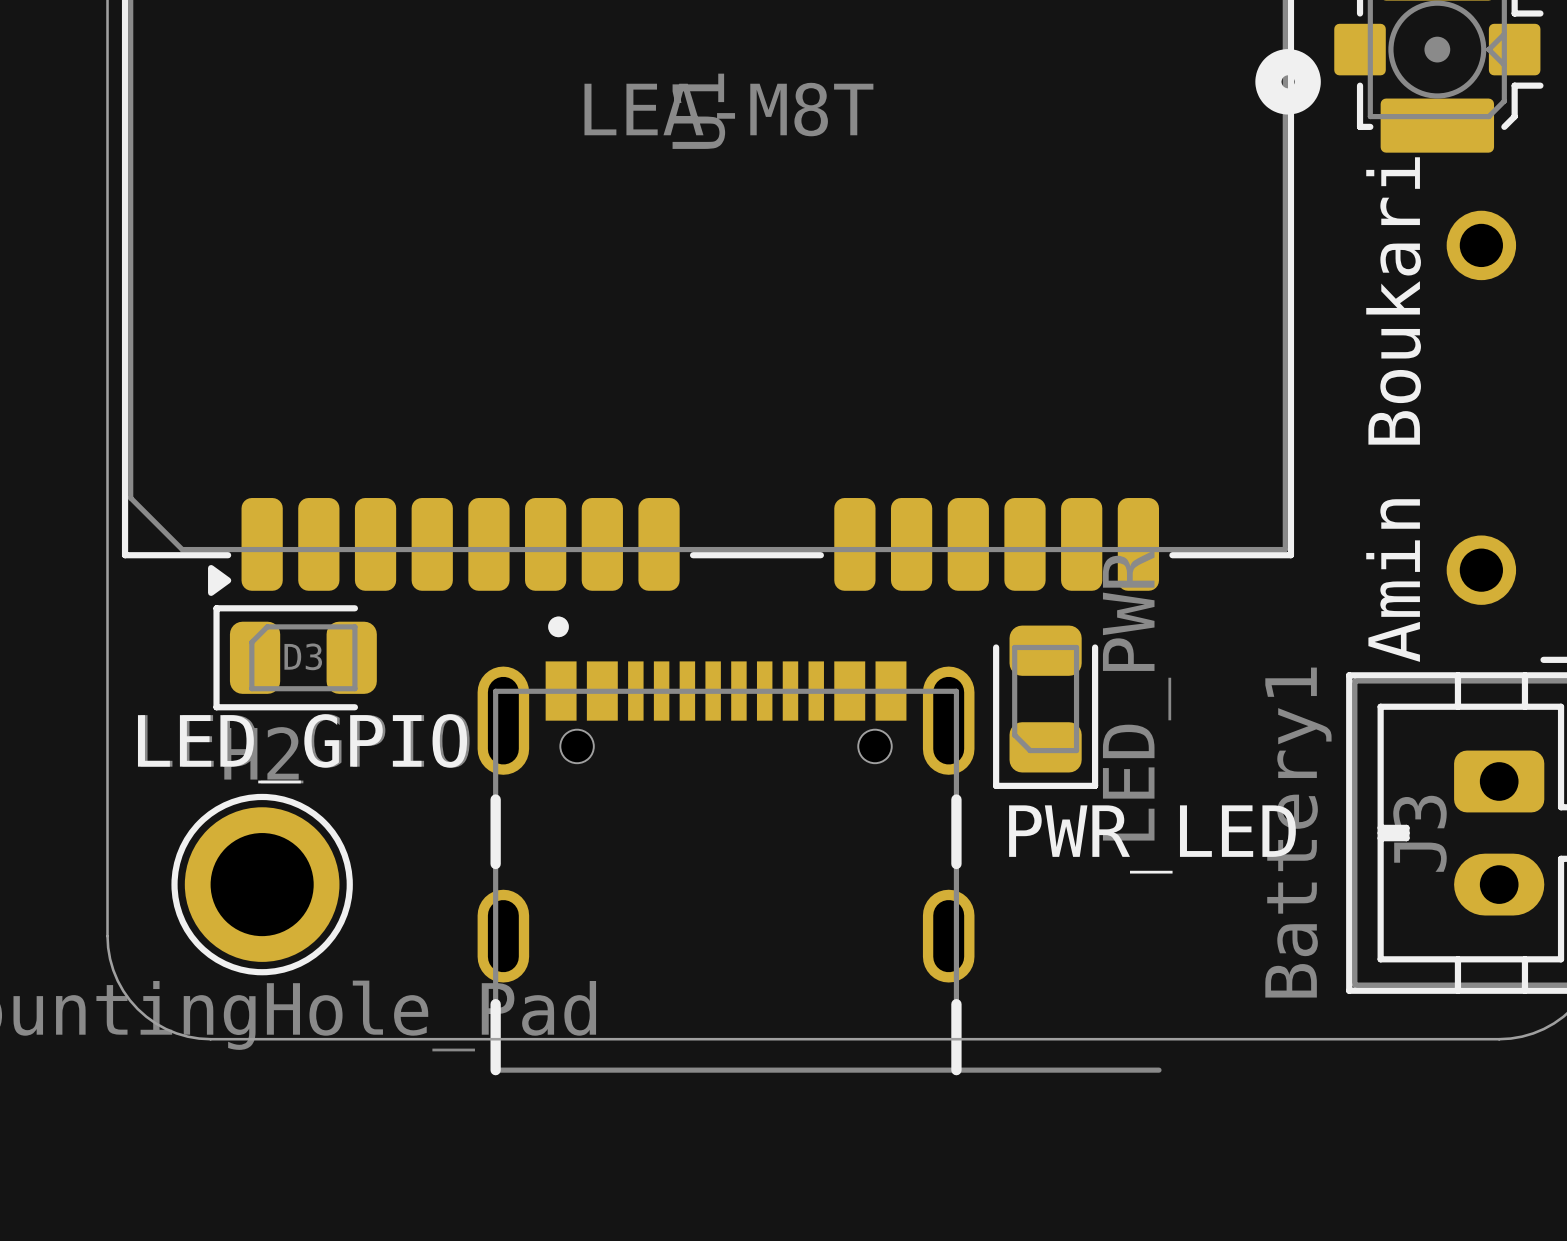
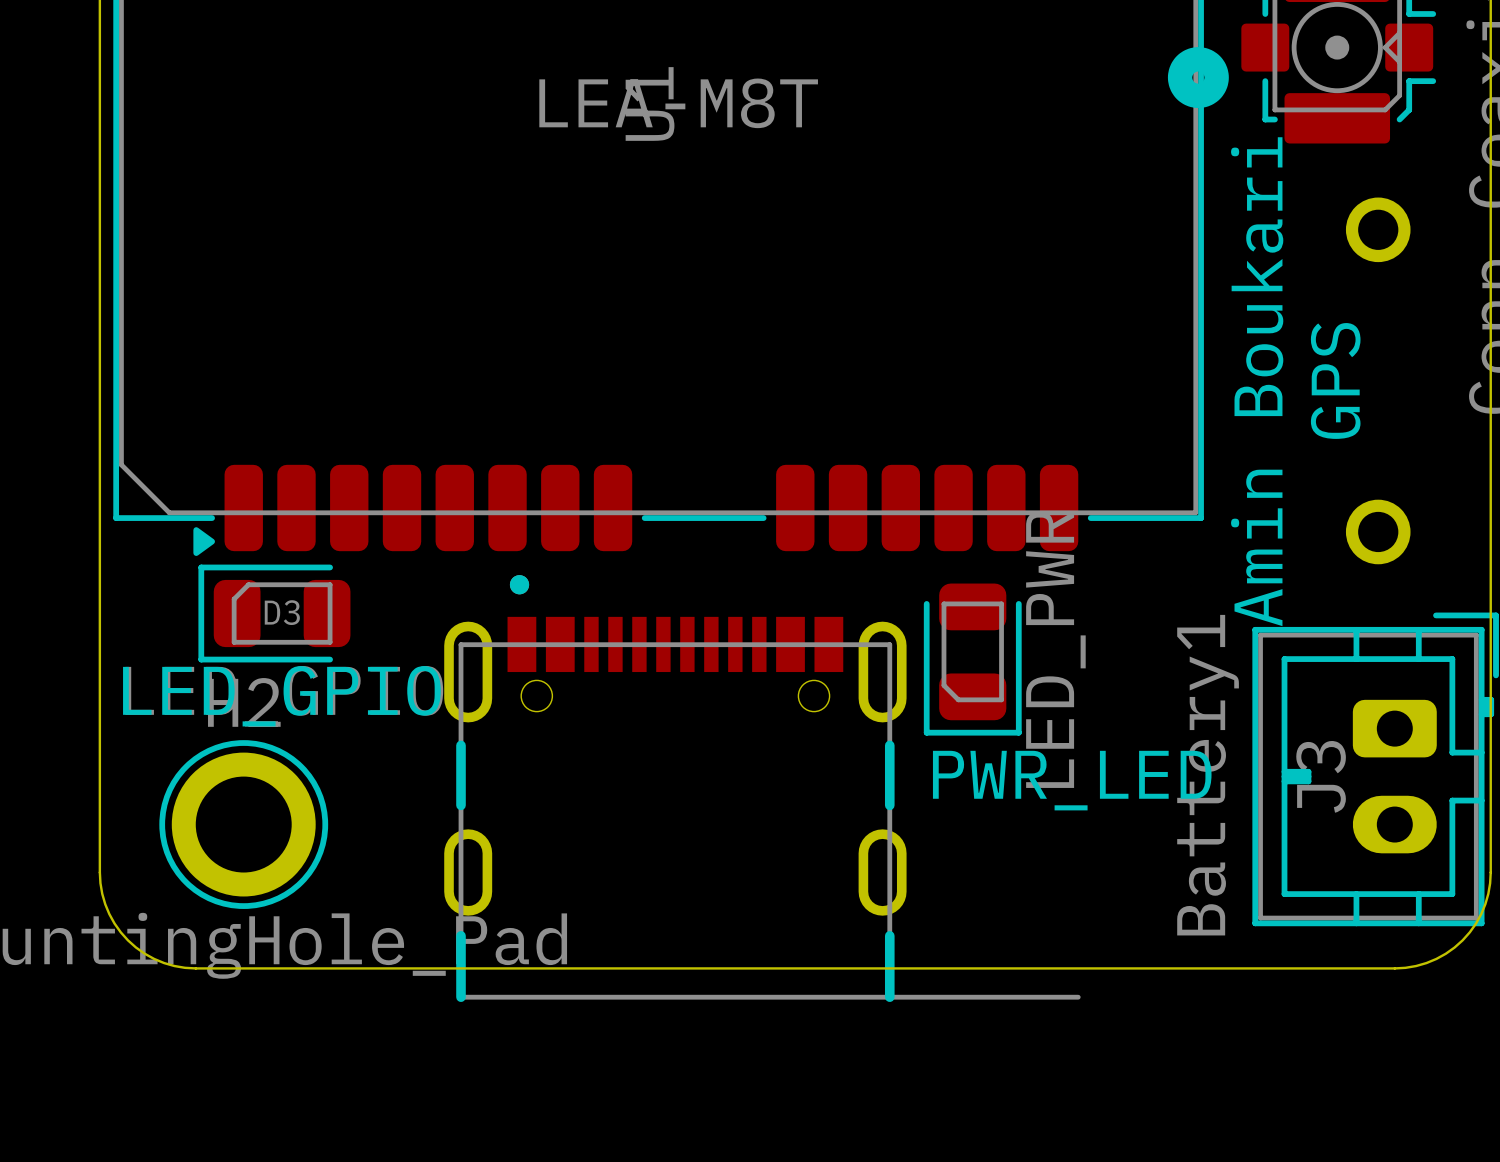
text: none -> GPS (1335, 380)
text position: Amin Boukari (1393, 409) -> Amin Boukari (1257, 381)

